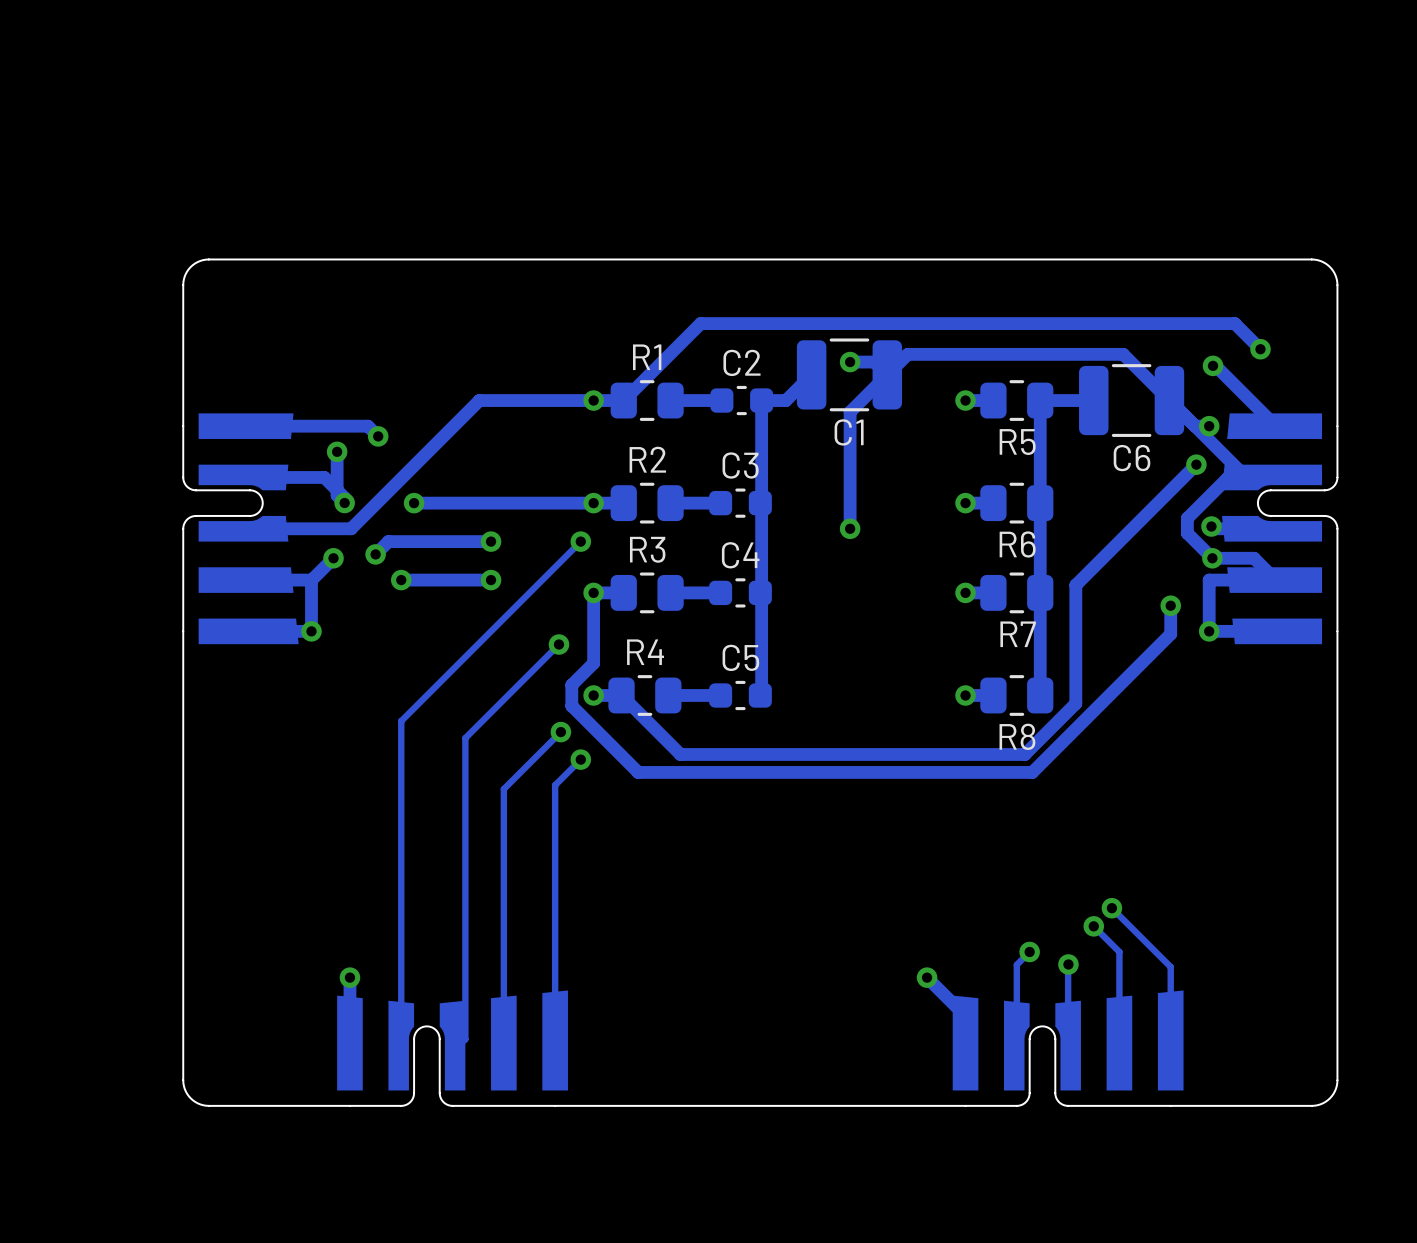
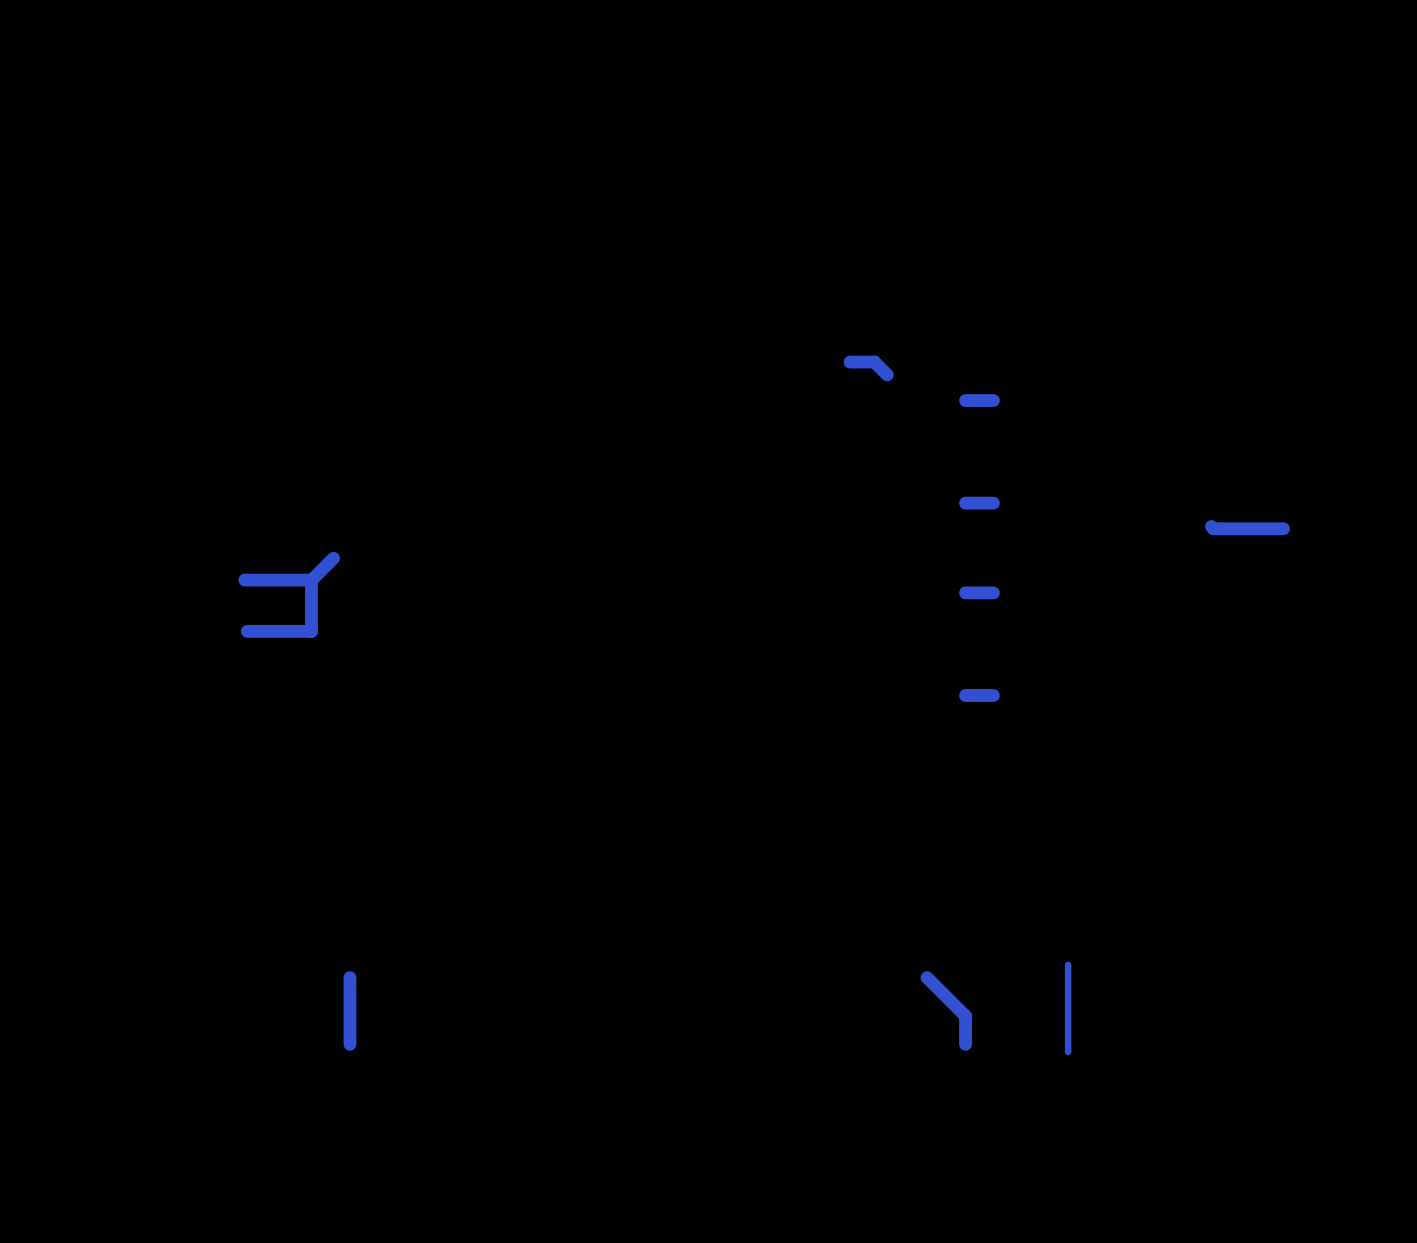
track: (1260, 349) (1234, 323) (700, 323) (623, 400) (479, 400) (351, 528) (237, 528) -> none
via: (1260, 349) -> none
via: (850, 362) -> none
track: (1213, 365) (1215, 365) (1275, 426) -> none
via: (1213, 365) -> none
track: (811, 374) (785, 400) (761, 400) (760, 695) -> none
C1: (849, 374) -> none
via: (593, 400) -> none
R1: (647, 400) -> none
track: (721, 400) (670, 400) -> none
C2: (741, 400) -> none
via: (965, 400) -> none
R5: (1016, 400) -> none
track: (1093, 400) (1040, 400) (1040, 695) -> none
C6: (1131, 400) -> none
track: (244, 426) (367, 426) (378, 436) -> none
via: (1209, 426) -> none
board edge: (1337, 426) (1337, 282) (1329, 266) (1322, 262) (1311, 259) (206, 259) (190, 266) (183, 282) (183, 426) -> none
via: (378, 436) -> none
track: (337, 451) (337, 495) (344, 503) (344, 497) (324, 477) (237, 477) -> none
via: (337, 451) -> none
track: (1196, 464) (1075, 585) (1075, 703) (1024, 754) (680, 754) (621, 695) (593, 695) -> none
via: (1196, 464) -> none
track: (1246, 477) (1123, 354) (907, 354) (850, 412) (850, 528) -> none
track: (1283, 477) (1228, 477) (1187, 518) (1187, 533) (1212, 558) (1254, 558) (1275, 580) (1209, 580) (1209, 631) (1278, 631) -> none
via: (344, 503) -> none
via: (414, 503) -> none
via: (593, 503) -> none
track: (623, 503) (414, 503) -> none
R2: (647, 503) -> none
track: (720, 503) (670, 503) -> none
C3: (740, 503) -> none
via: (965, 503) -> none
R6: (1016, 503) -> none
via: (1211, 526) -> none
part: (240, 528) -> none
via: (850, 528) -> none
part: (1280, 528) -> none
track: (491, 541) (388, 541) (375, 554) -> none
via: (491, 541) -> none
track: (580, 541) (401, 721) (401, 1052) -> none
via: (580, 541) -> none
via: (375, 554) -> none
via: (333, 558) -> none
via: (1212, 558) -> none
via: (401, 580) -> none
track: (491, 580) (401, 580) -> none
via: (491, 580) -> none
via: (593, 592) -> none
track: (623, 592) (593, 592) (593, 663) (571, 685) (571, 705) (638, 772) (1032, 772) (1170, 634) (1170, 605) -> none
R3: (647, 592) -> none
track: (720, 592) (670, 592) -> none
C4: (740, 592) -> none
via: (965, 592) -> none
R7: (1016, 592) -> none
via: (1170, 605) -> none
board edge: (183, 631) (184, 1088) (192, 1100) (206, 1105) (349, 1105) -> none
via: (311, 631) -> none
via: (1209, 631) -> none
board edge: (1337, 631) (1336, 1088) (1327, 1100) (1314, 1105) (1170, 1105) -> none
track: (559, 644) (465, 738) (465, 1039) (452, 1052) -> none
via: (559, 644) -> none
via: (593, 695) -> none
R4: (644, 695) -> none
track: (720, 695) (668, 695) -> none
C5: (740, 695) -> none
via: (965, 695) -> none
R8: (1016, 695) -> none
track: (560, 732) (503, 789) (503, 1044) -> none
via: (560, 732) -> none
track: (580, 759) (555, 785) (555, 1041) -> none
via: (580, 759) -> none
track: (1111, 908) (1170, 967) (1170, 1041) -> none
via: (1111, 908) -> none
track: (1093, 926) (1119, 951) (1119, 1044) -> none
via: (1093, 926) -> none
track: (1029, 951) (1016, 964) (1016, 1052) -> none
via: (1029, 951) -> none
via: (1068, 964) -> none
via: (349, 977) -> none
via: (927, 977) -> none
part: (452, 1048) -> none
part: (1068, 1048) -> none
board edge: (965, 1105) (555, 1105) -> none

